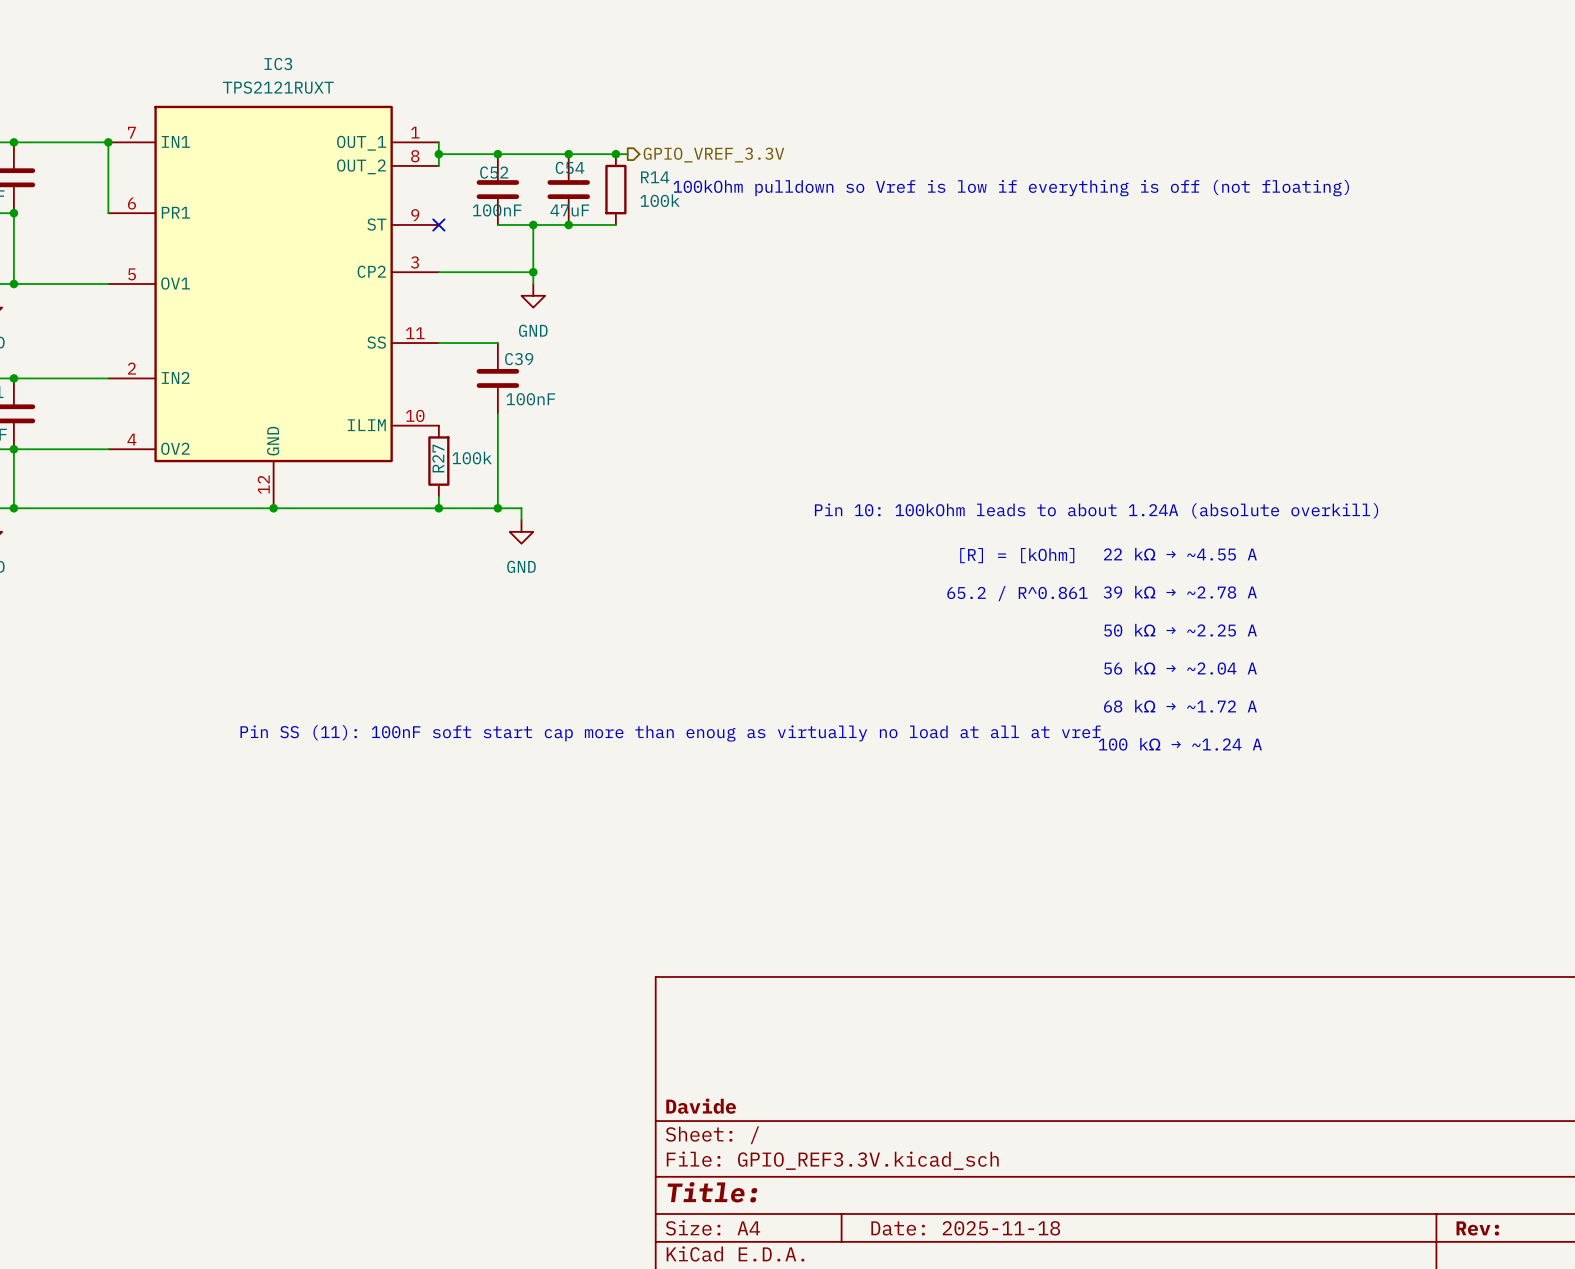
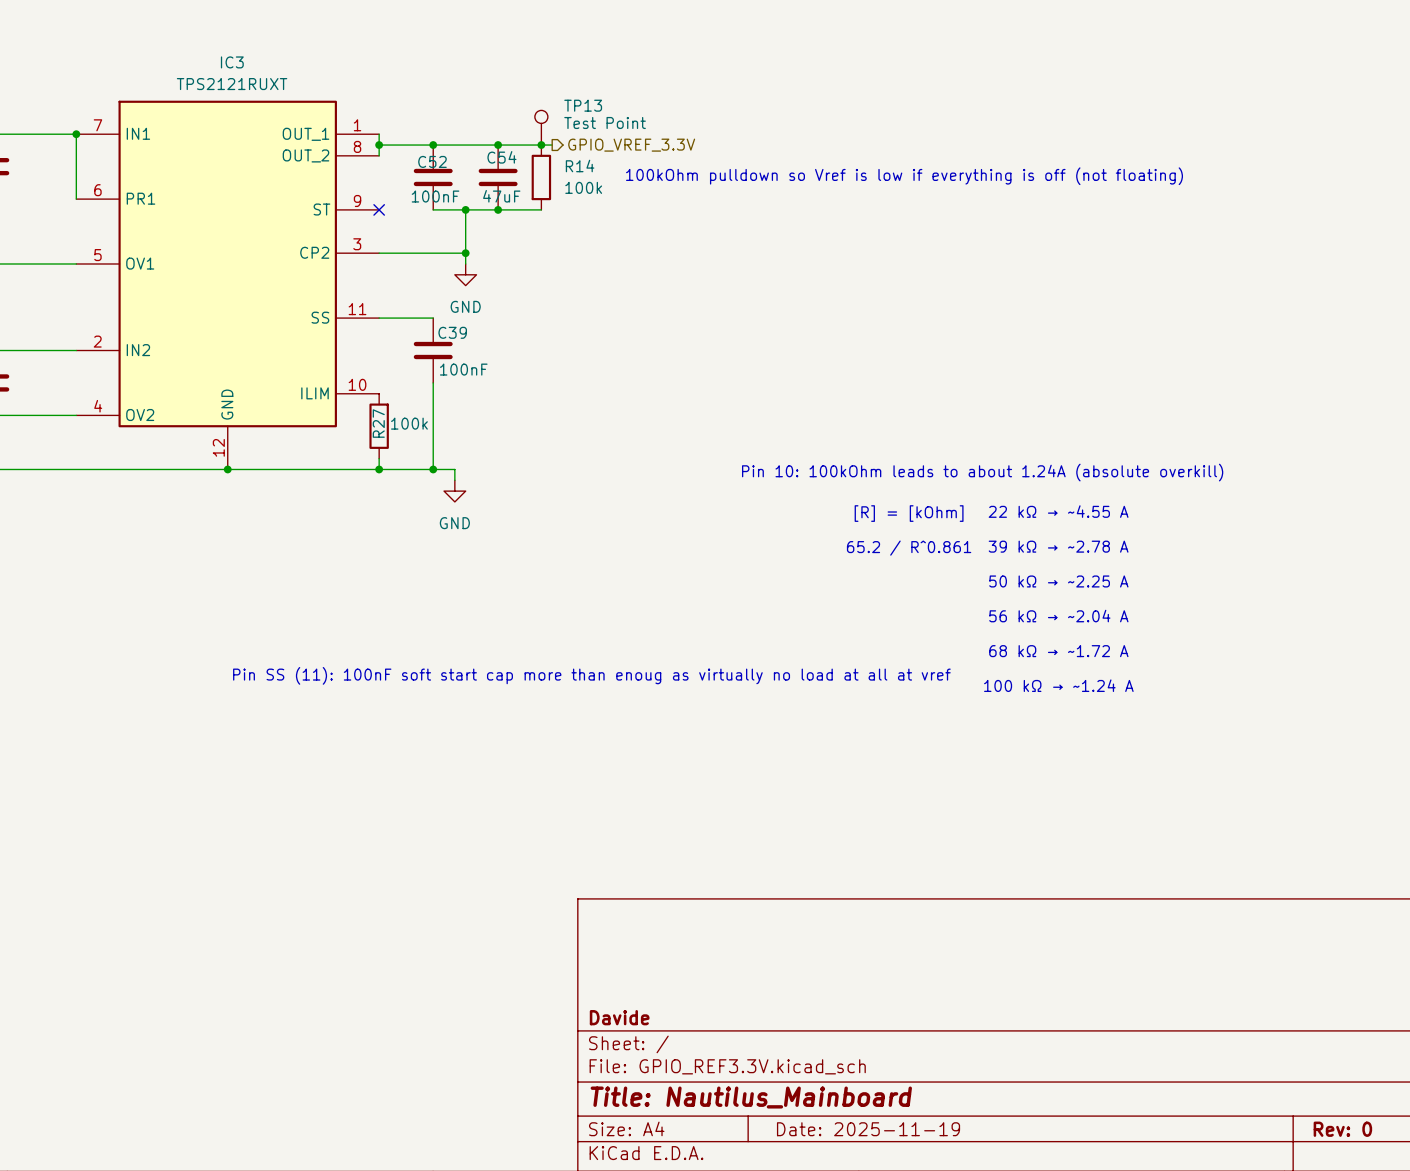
TP13: none -> Test Point (541, 127)
title block: Title: (712, 1192) -> Title: Nautilus_Mainboard (751, 1097)
title block: Date: 2025-11-18 (965, 1228) -> Date: 2025-11-19 (868, 1129)
title block: Rev: (1477, 1228) -> Rev: 0 (1342, 1129)

